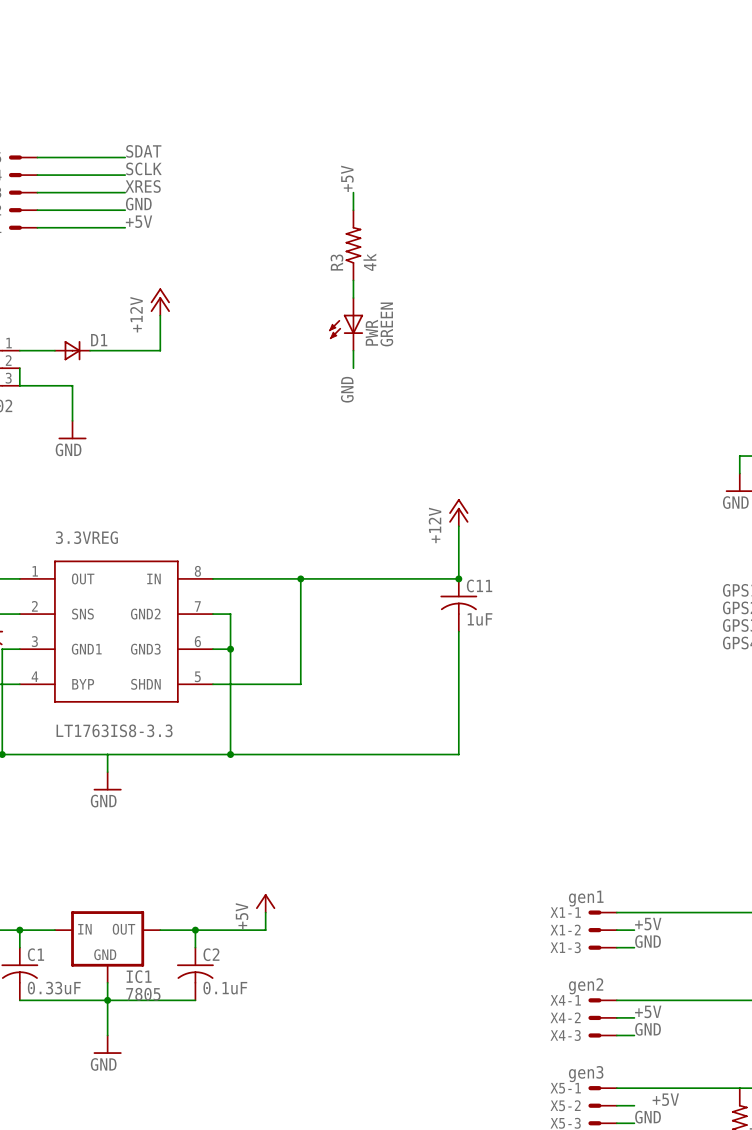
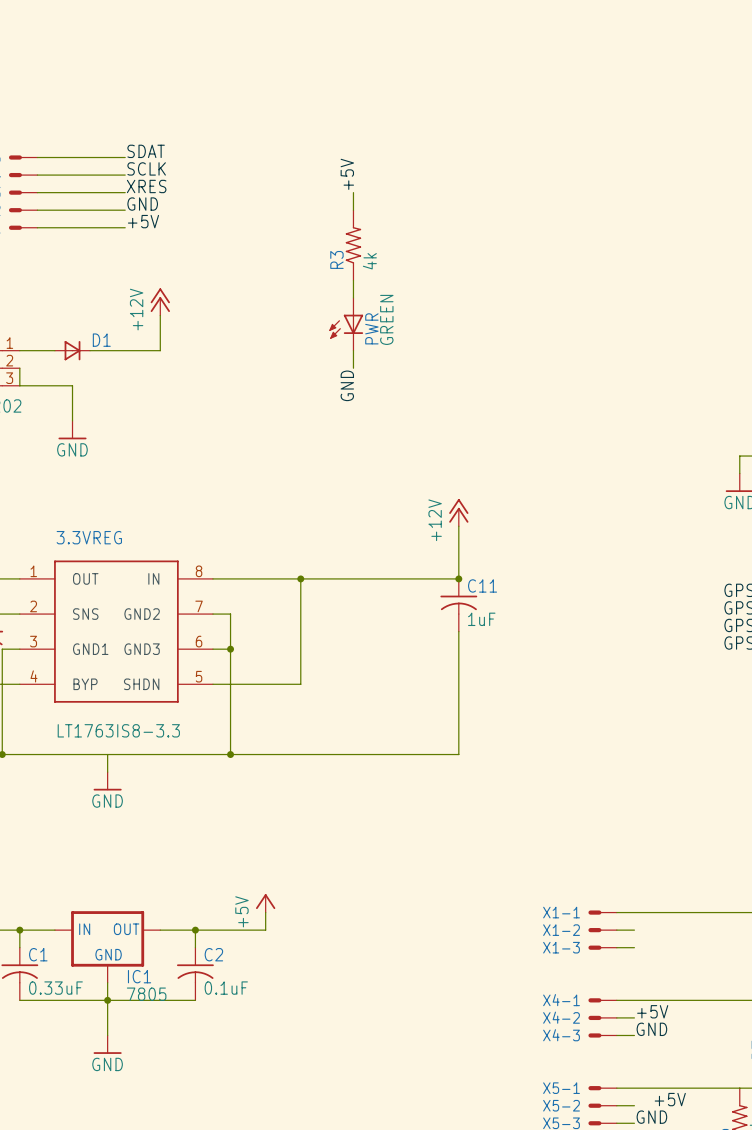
X1-1 value: gen1 (586, 898) -> none
label: +5V (648, 924) -> none
label: GND (648, 941) -> none
X4-1 value: gen2 (586, 986) -> none
X5-1 value: gen3 (586, 1074) -> none

